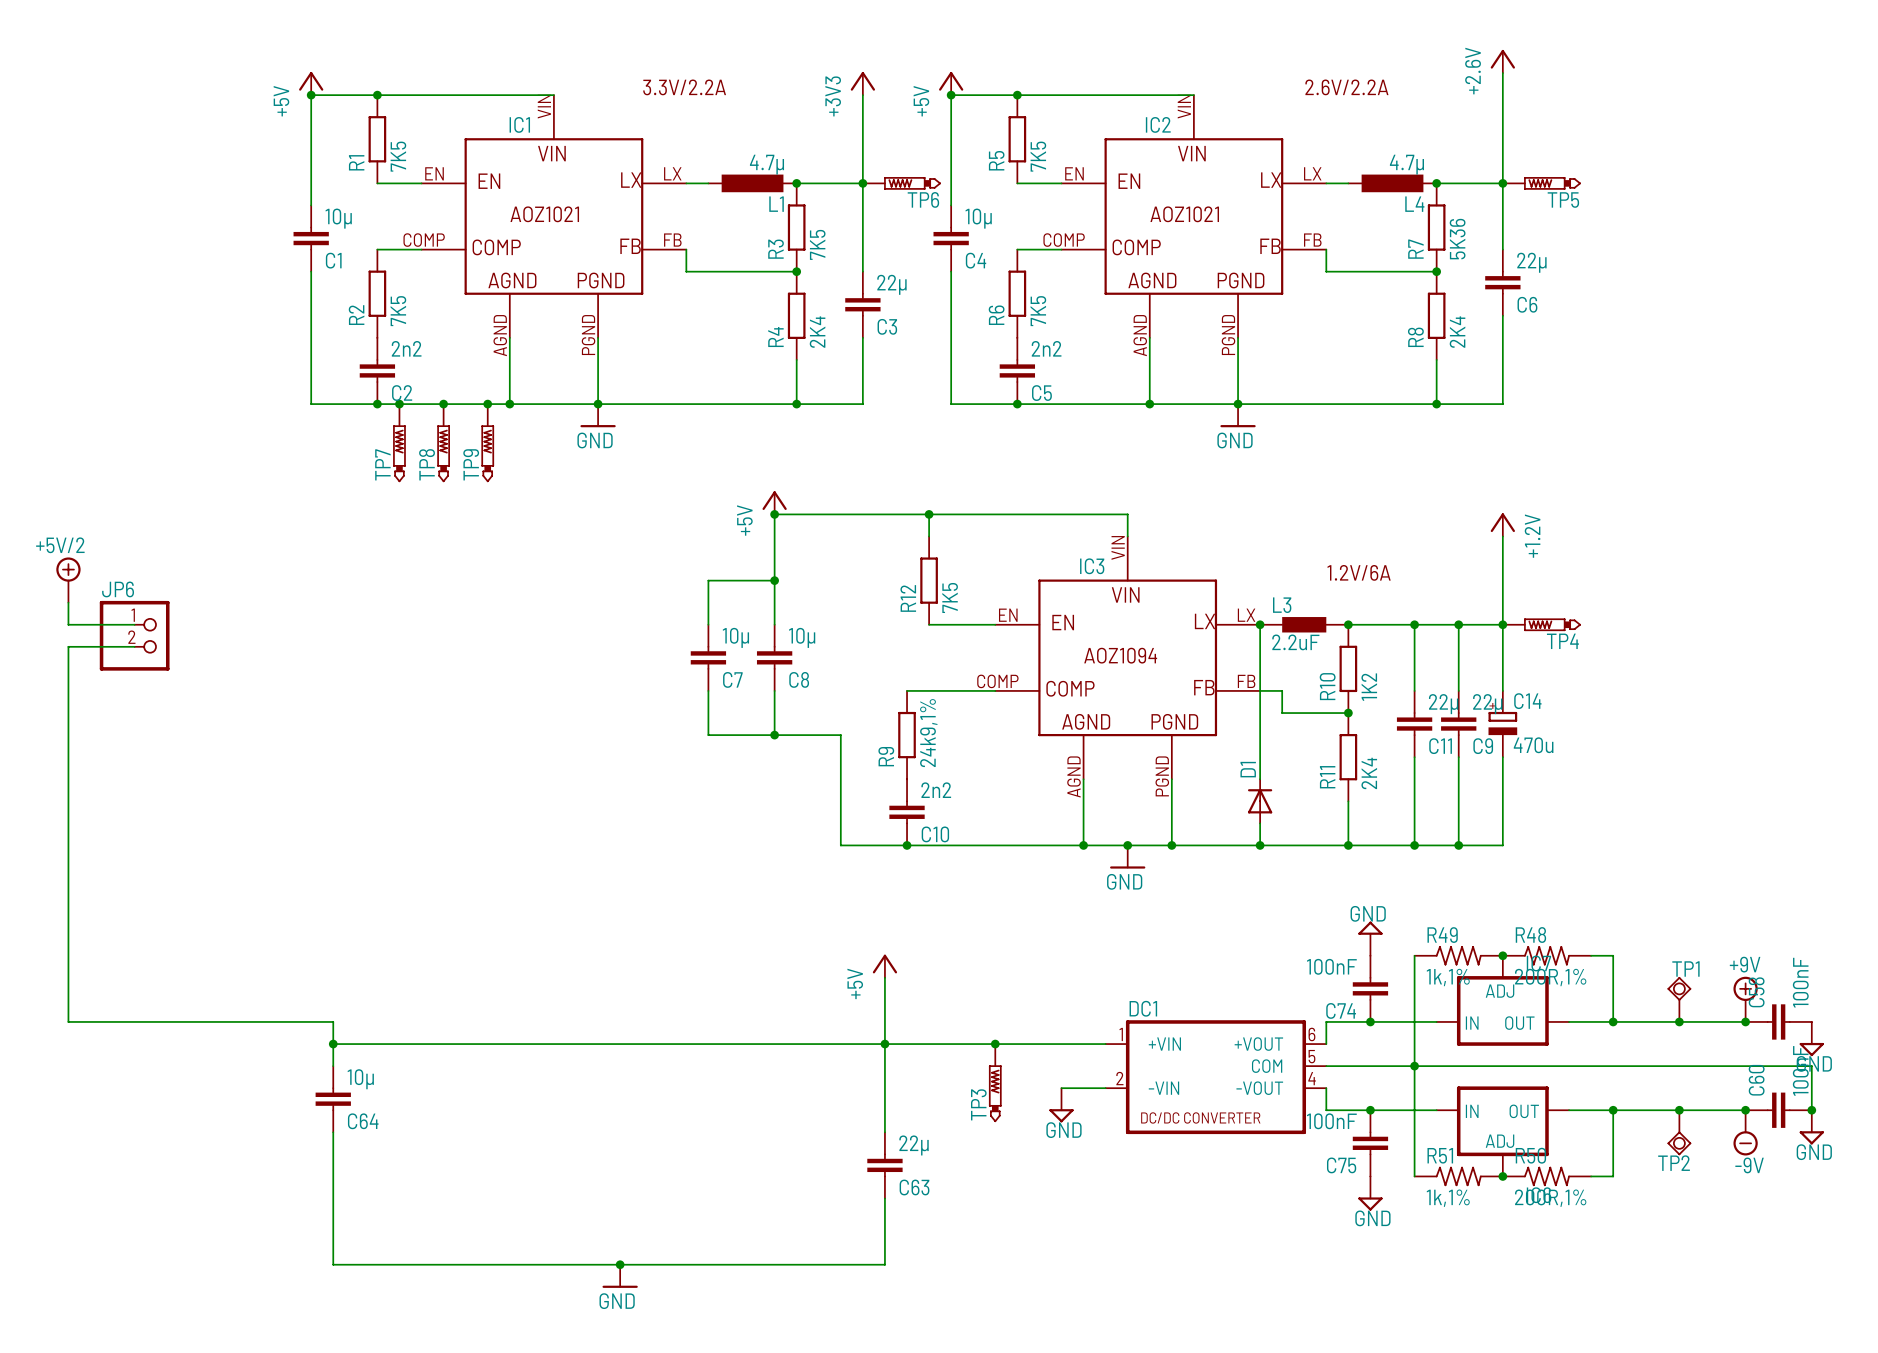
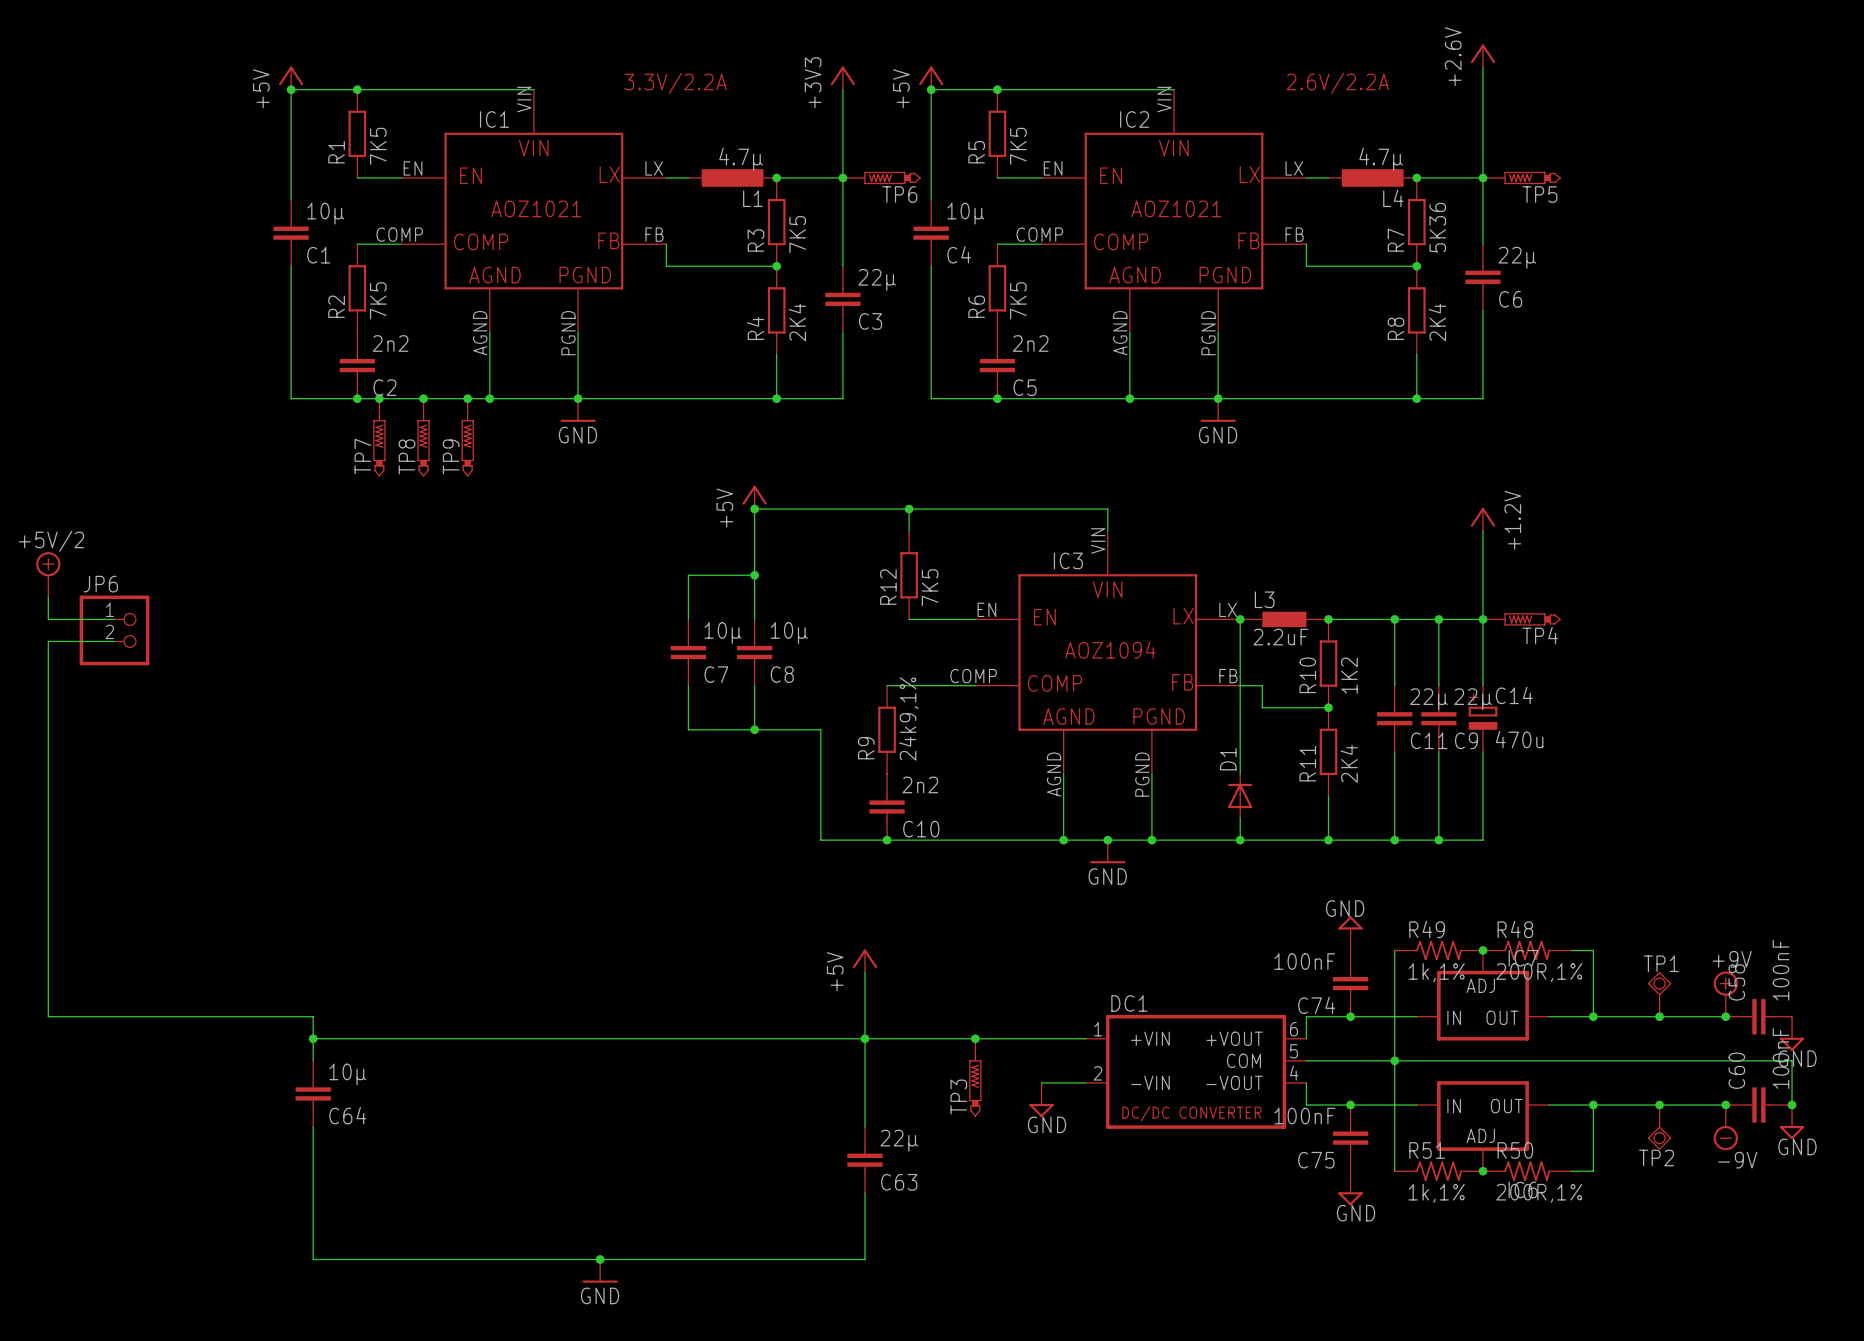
text: 1.2V/6A (1359, 572) -> none

